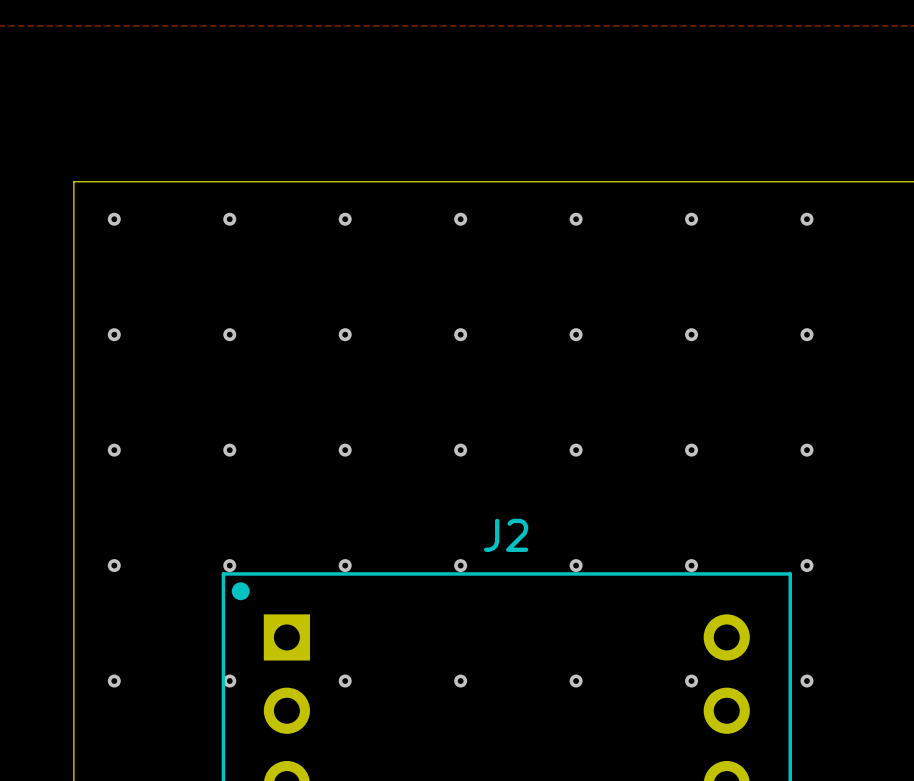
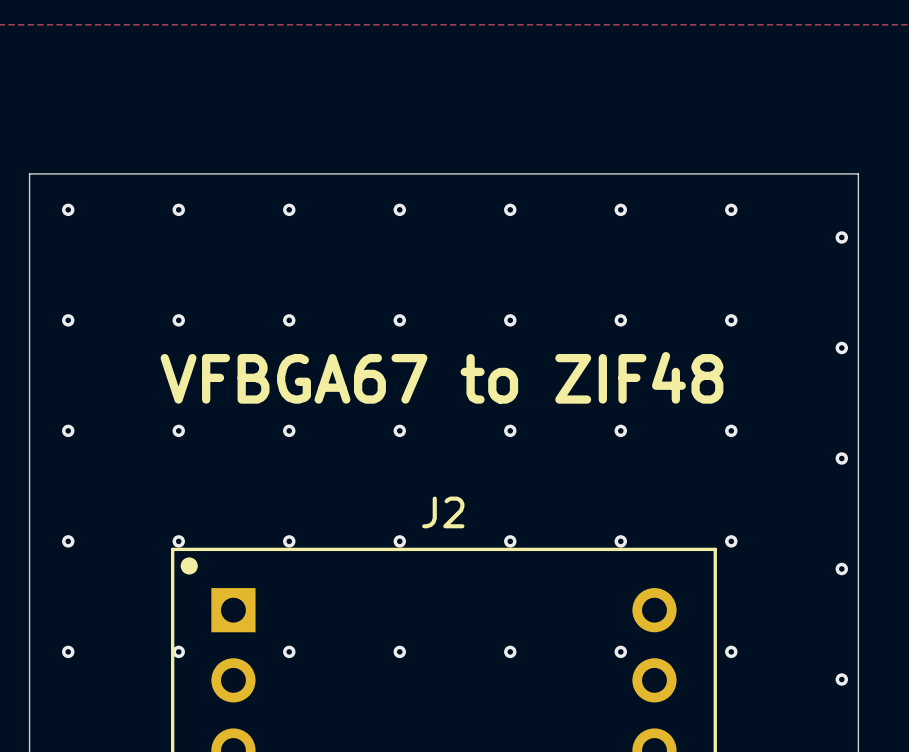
text: none -> VFBGA67 to ZIF48 (441, 377)

